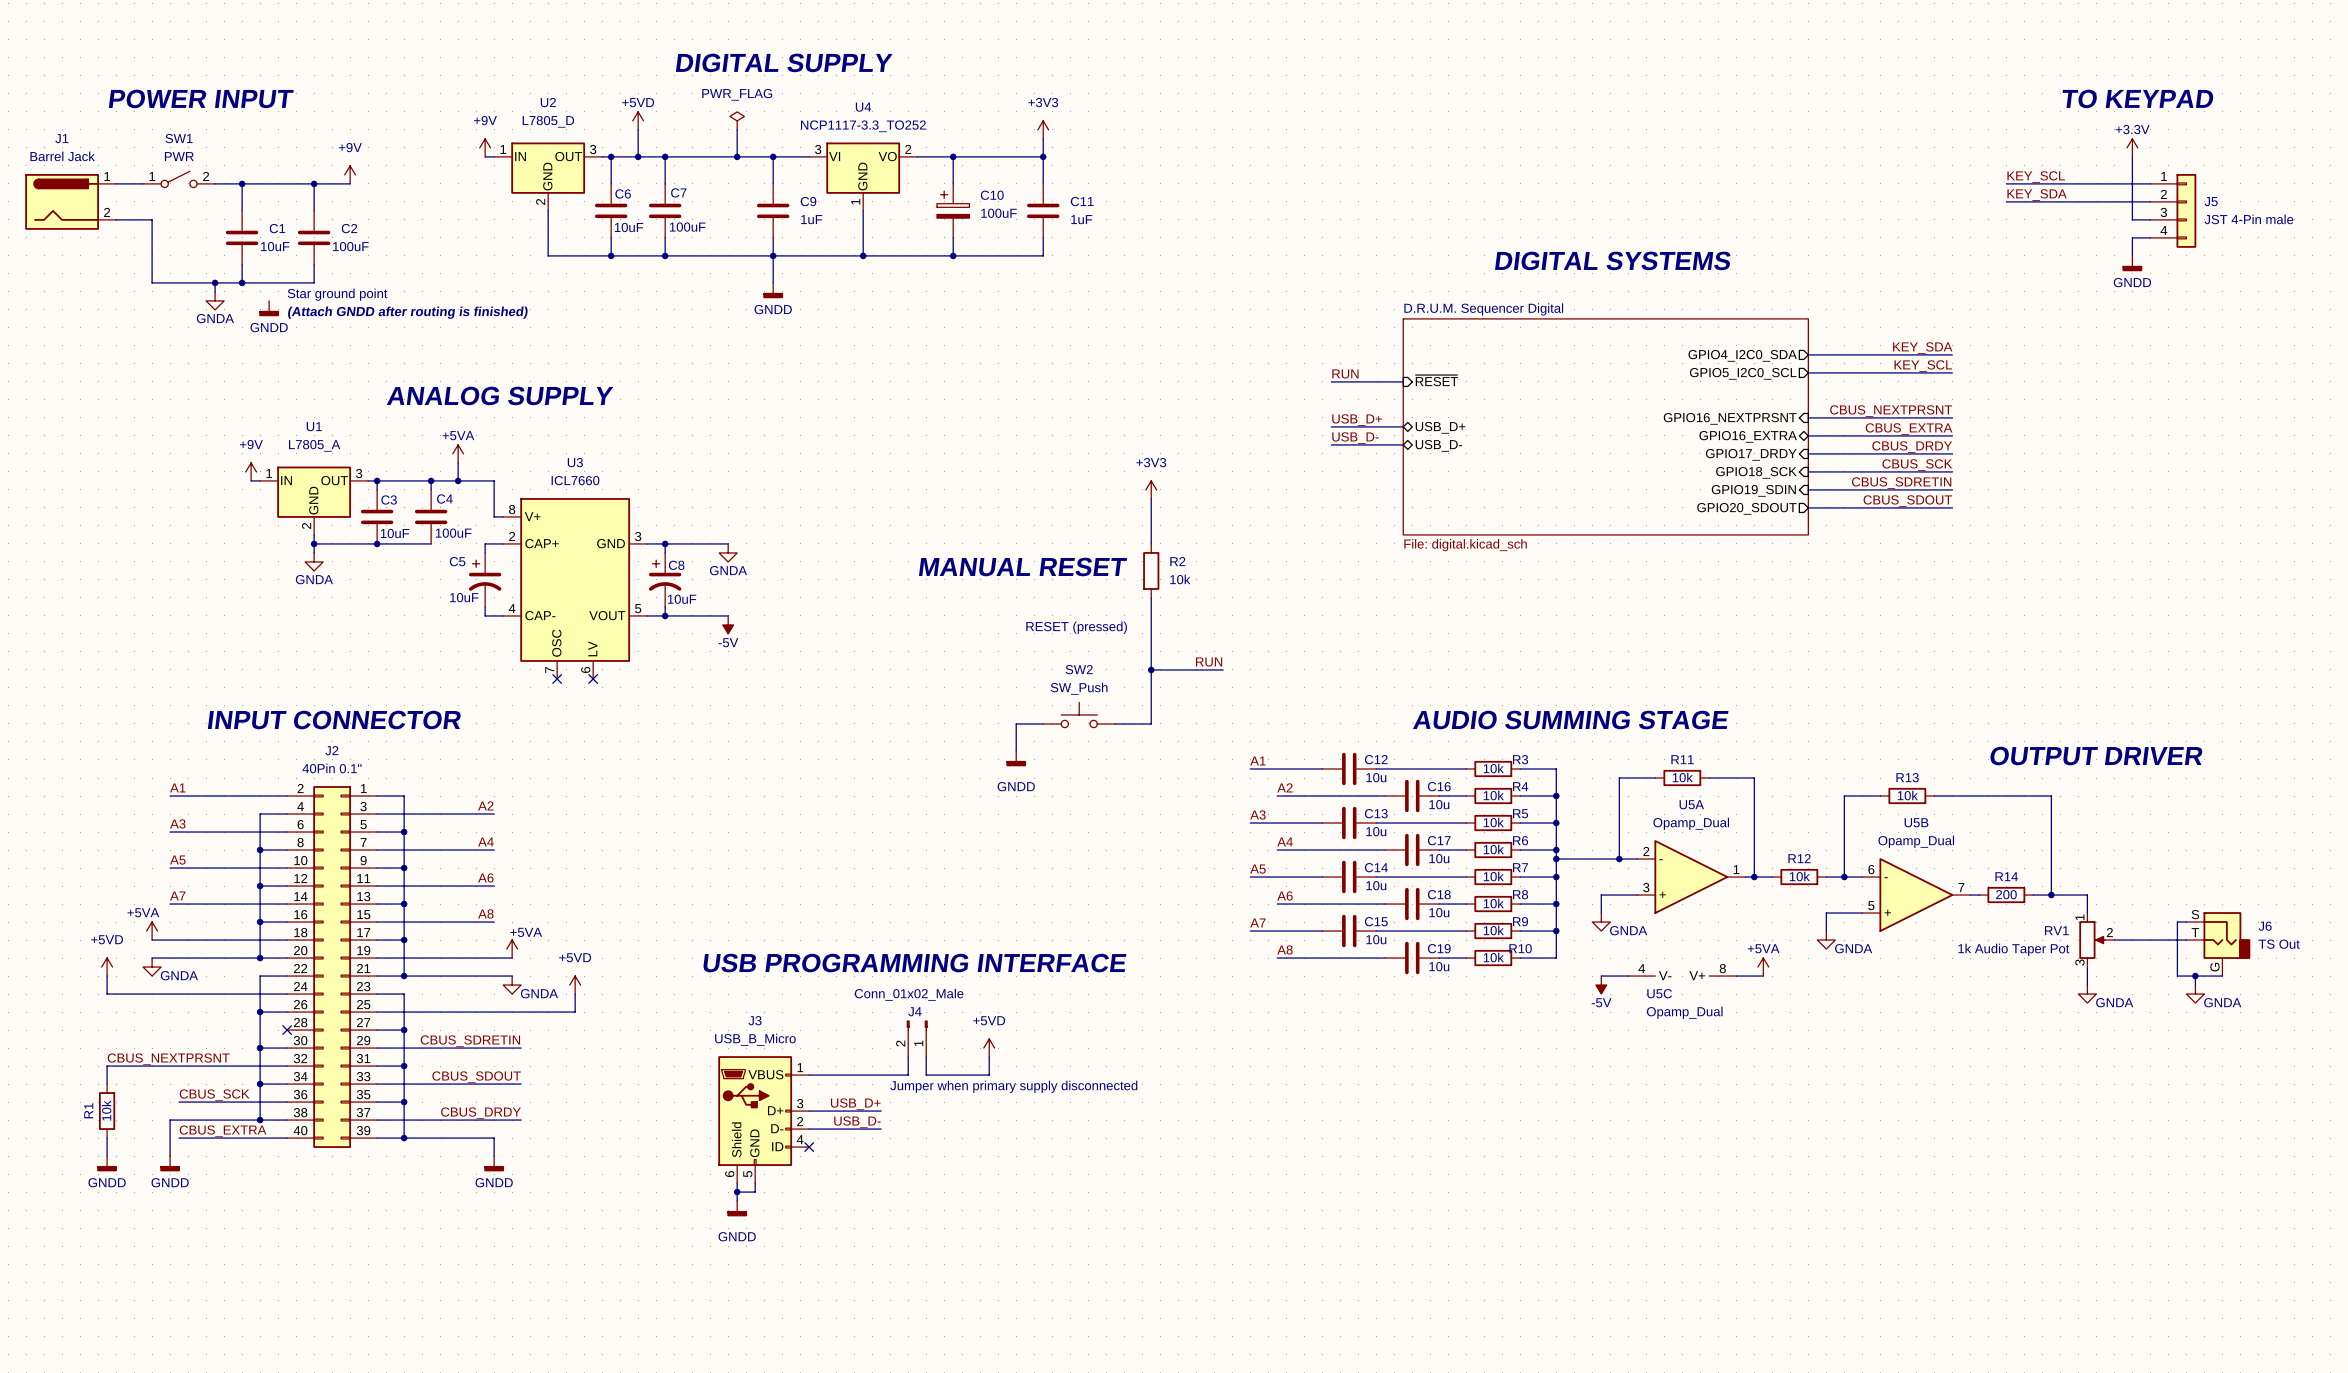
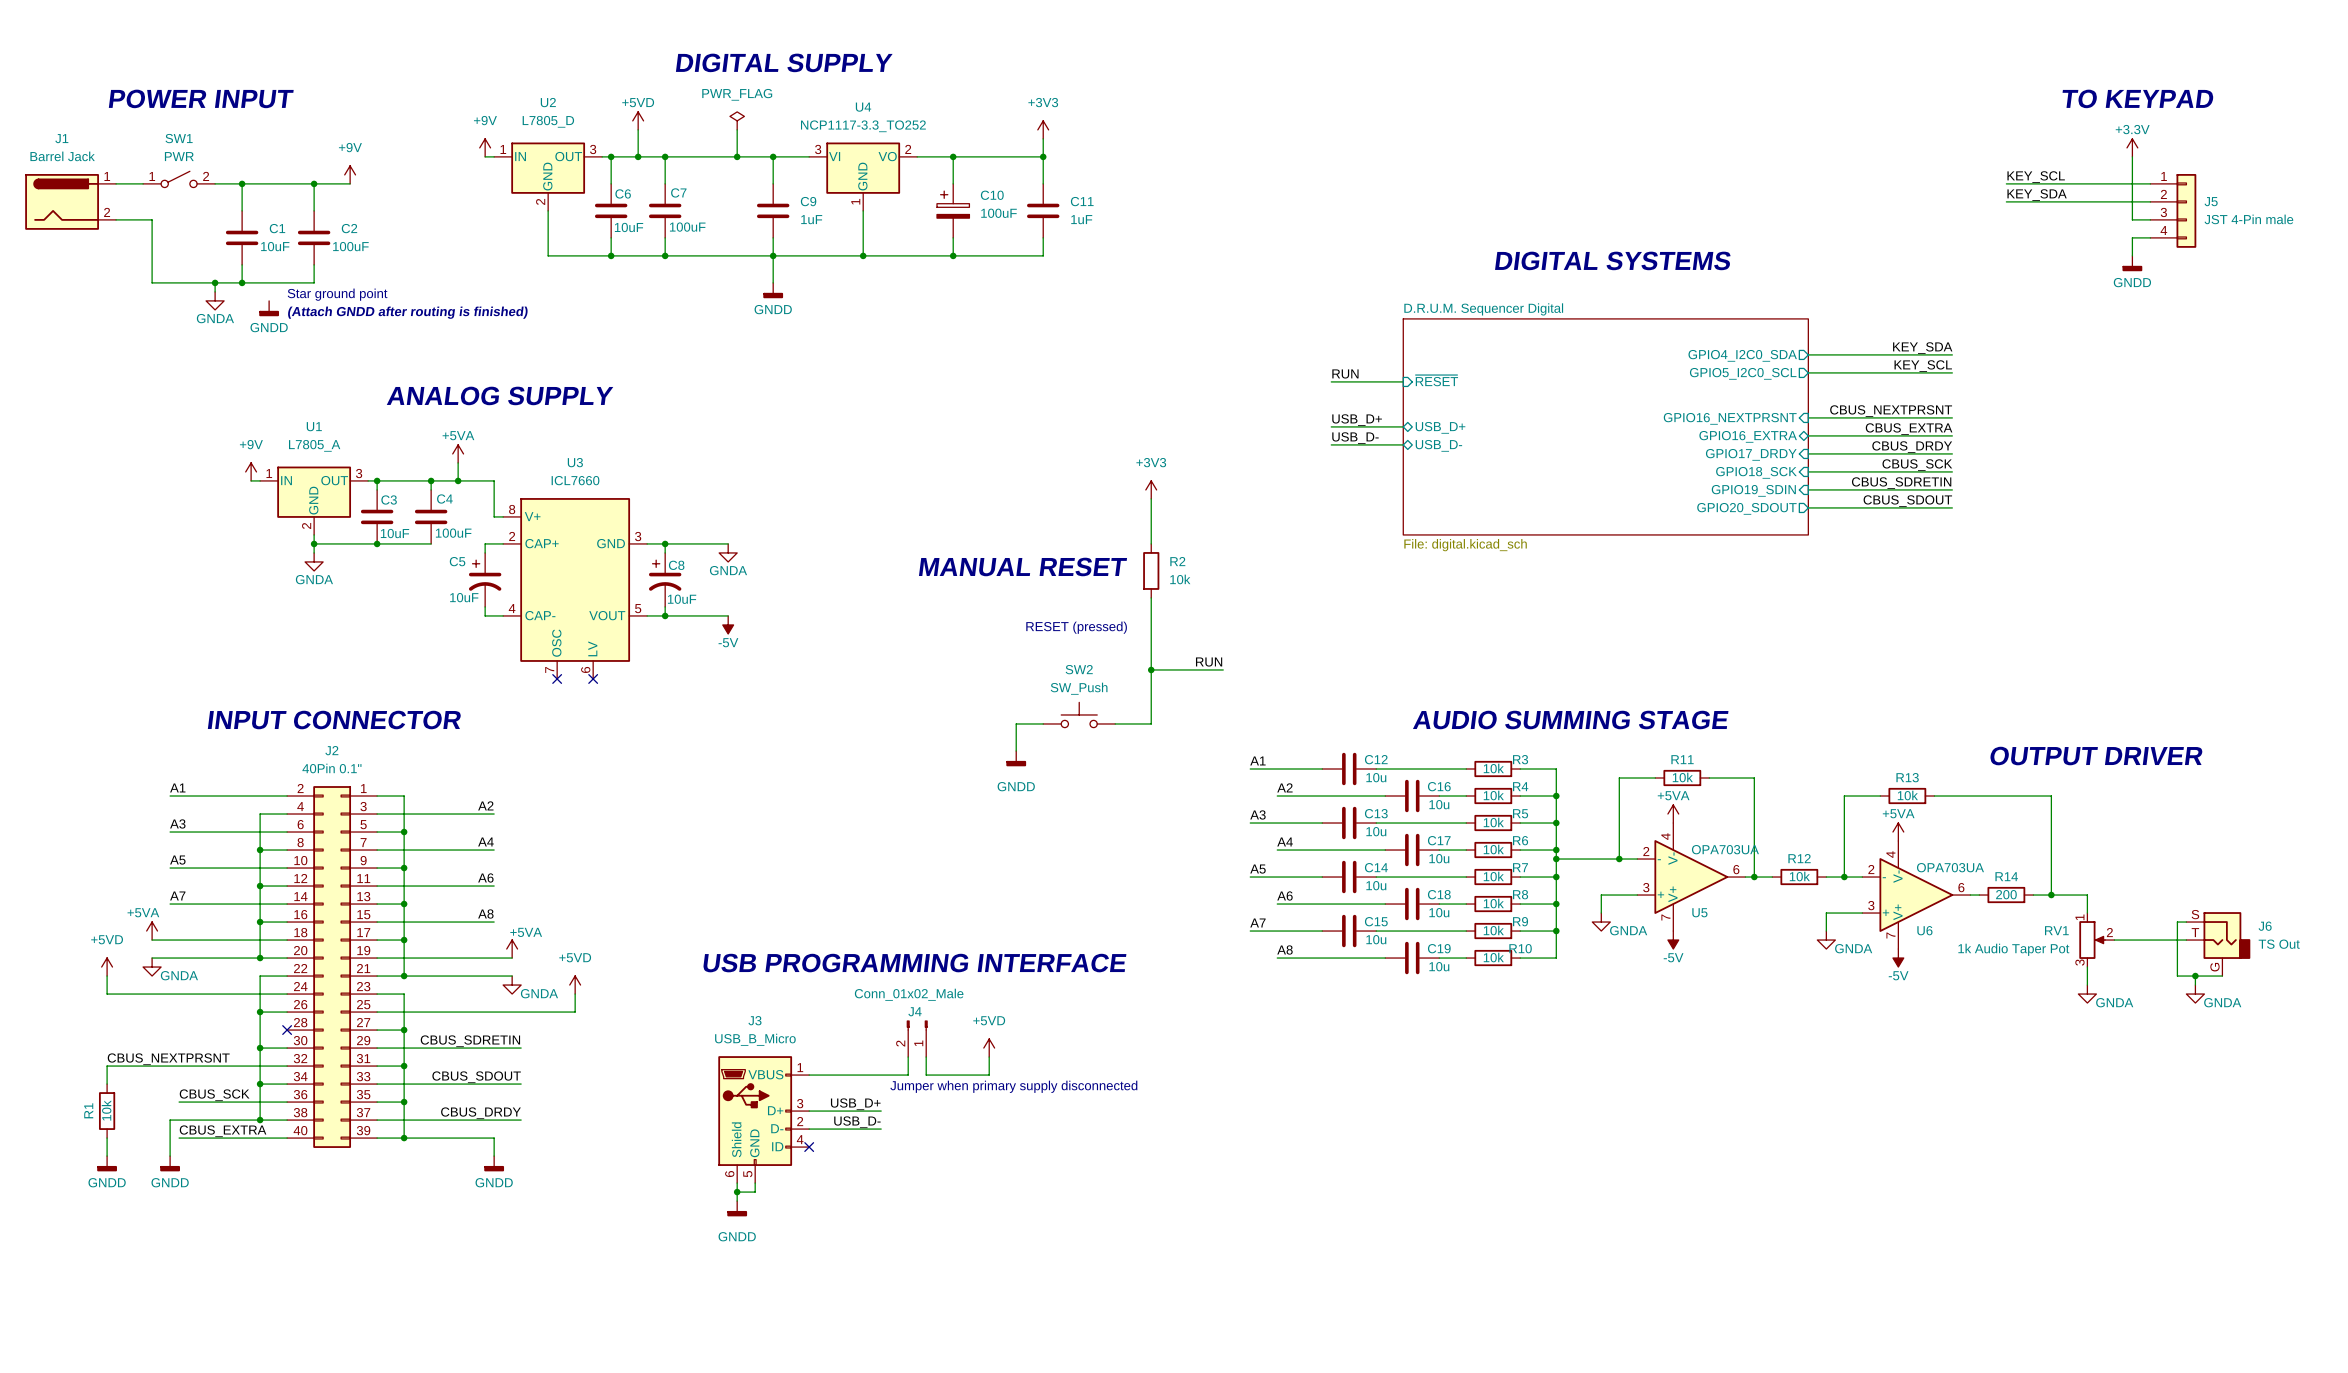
power symbol: none -> +5VA (1673, 814)
power symbol: none -> +5VA (1898, 832)
U5A: Opamp_Dual (1691, 877) -> none
U5: none -> OPA703UA (1691, 877)
U5B: Opamp_Dual (1916, 895) -> none
U6: none -> OPA703UA (1916, 895)
power symbol: none -> -5V (1898, 958)
power symbol: +5VA (1763, 967) -> none
wire: (1601, 976) (1628, 976) -> none
U5C: Opamp_Dual (1682, 976) -> none
wire: (1736, 976) (1763, 976) -> none
power symbol position: -5V (1601, 985) -> -5V (1673, 940)

